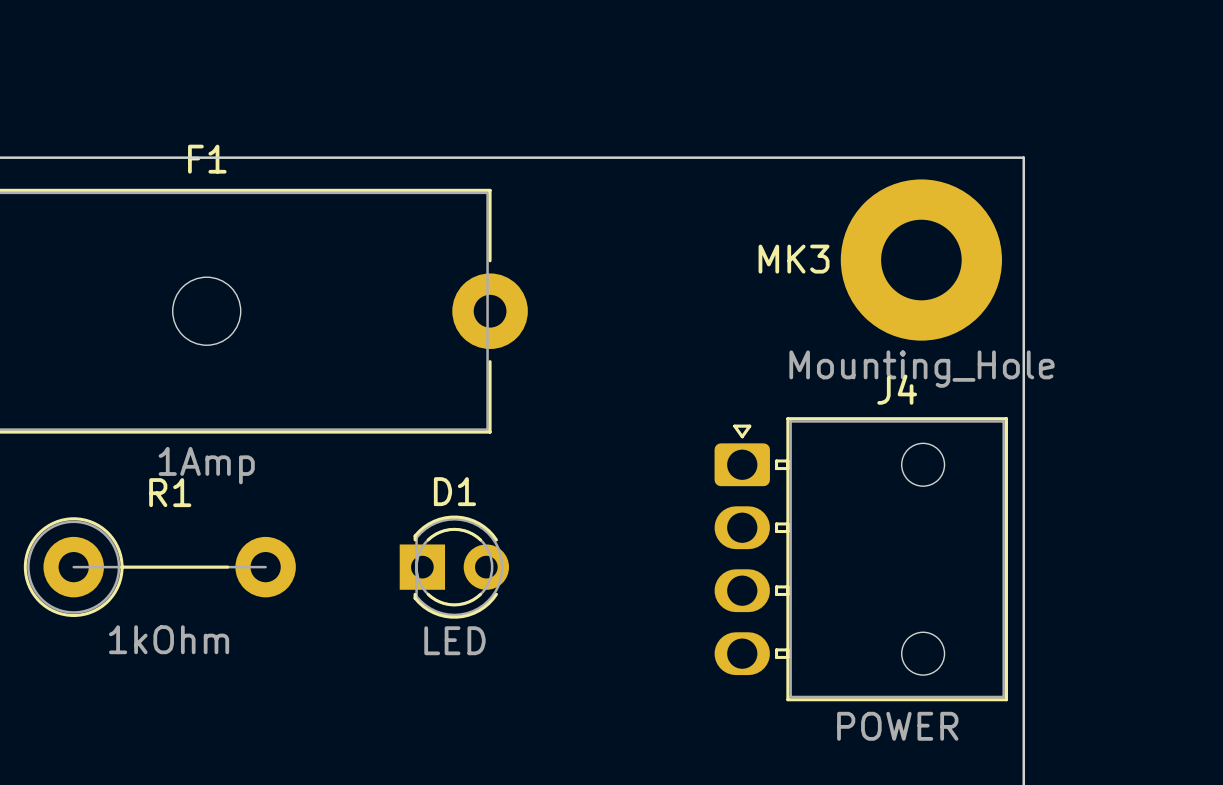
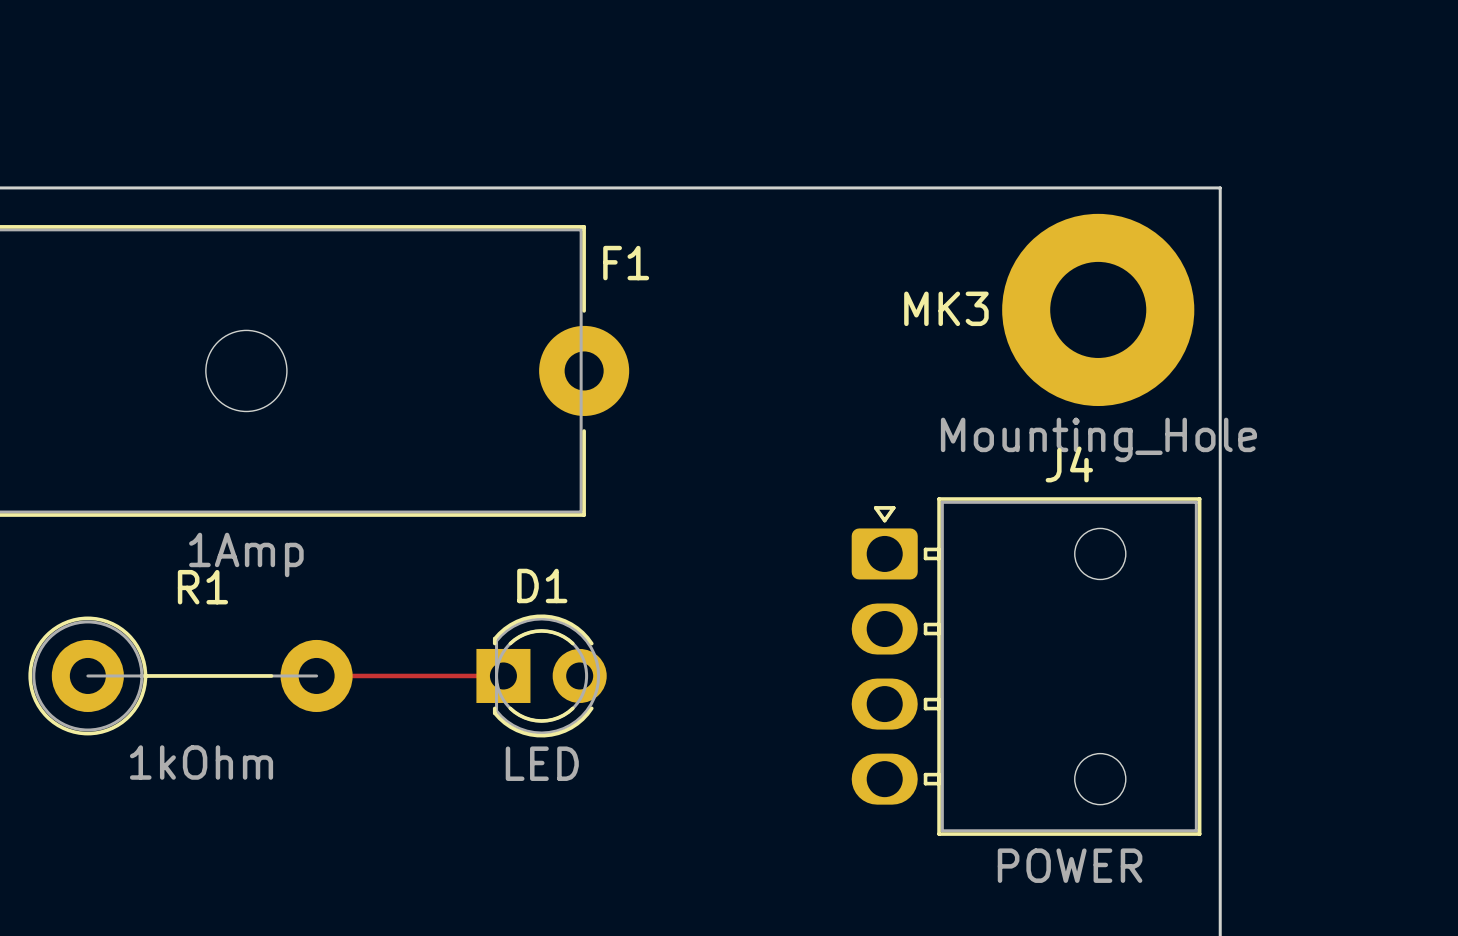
F1 name position: F1 (207, 159) -> F1 (626, 263)
track: none -> (316, 675) (503, 675)

